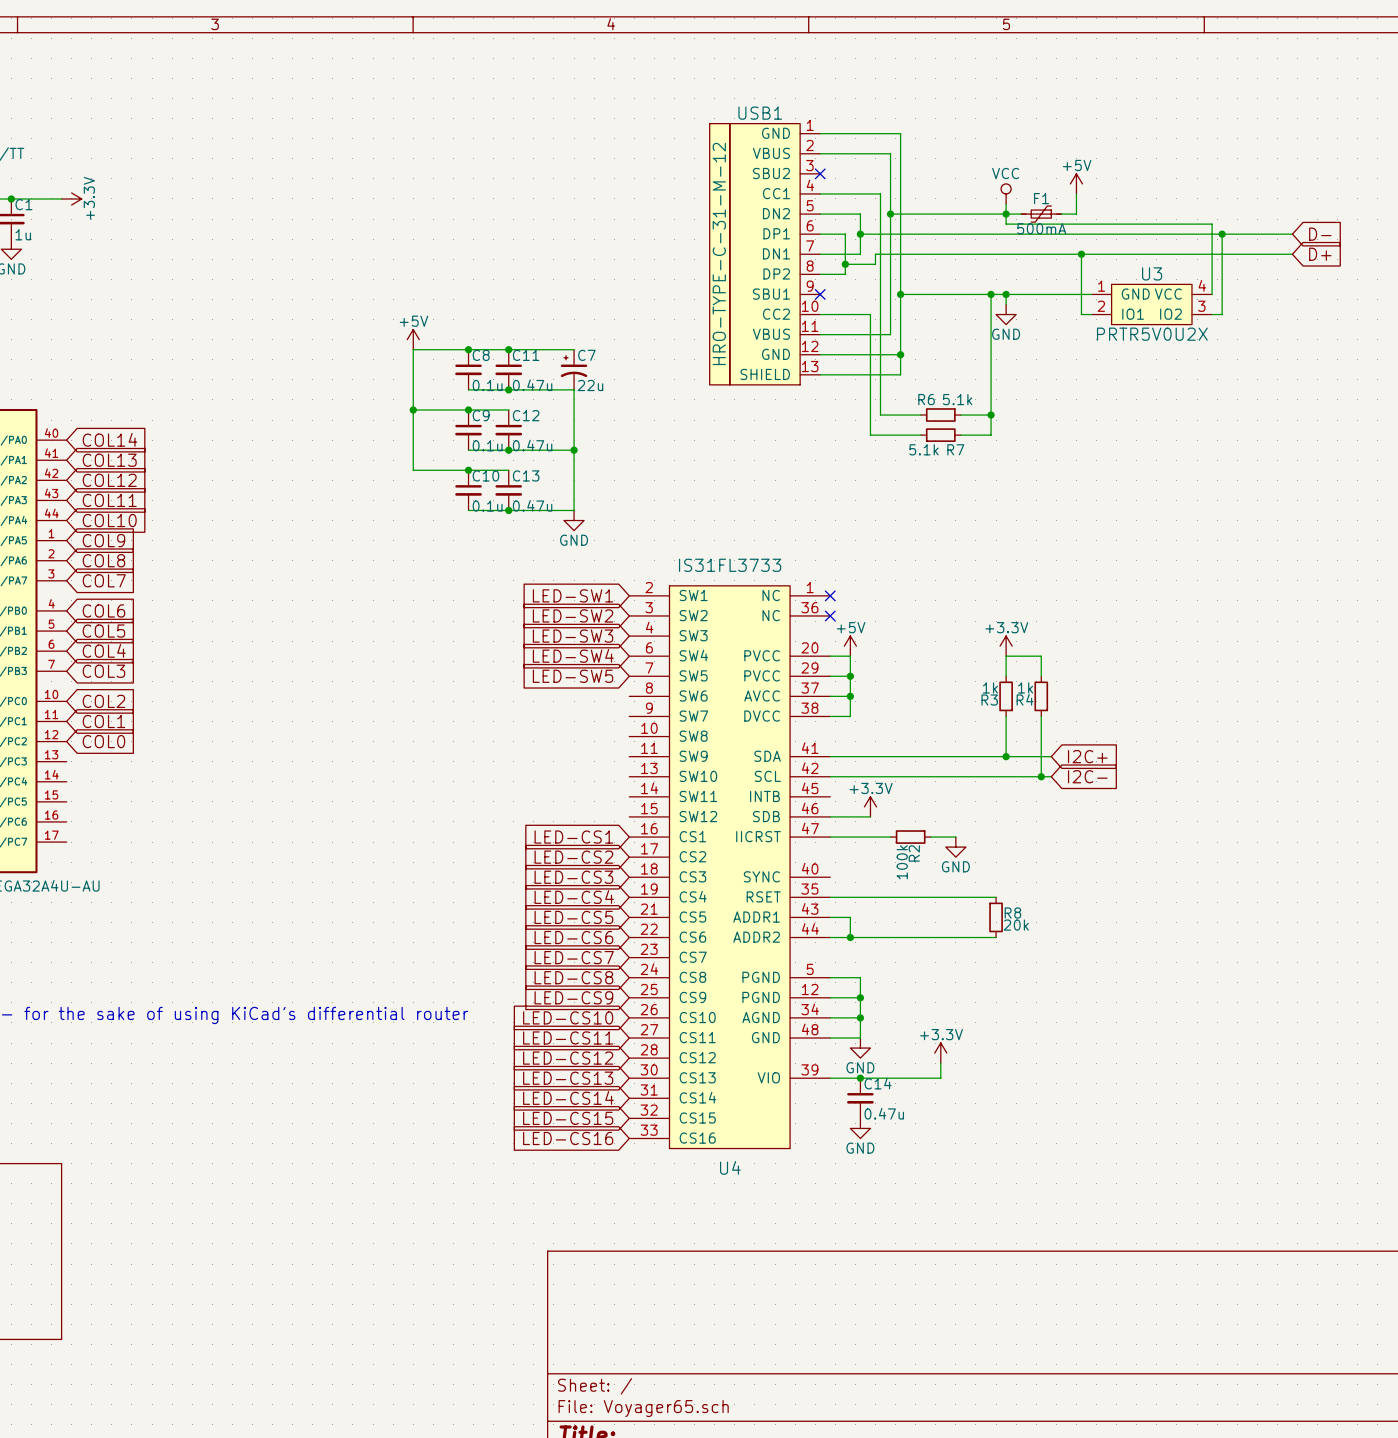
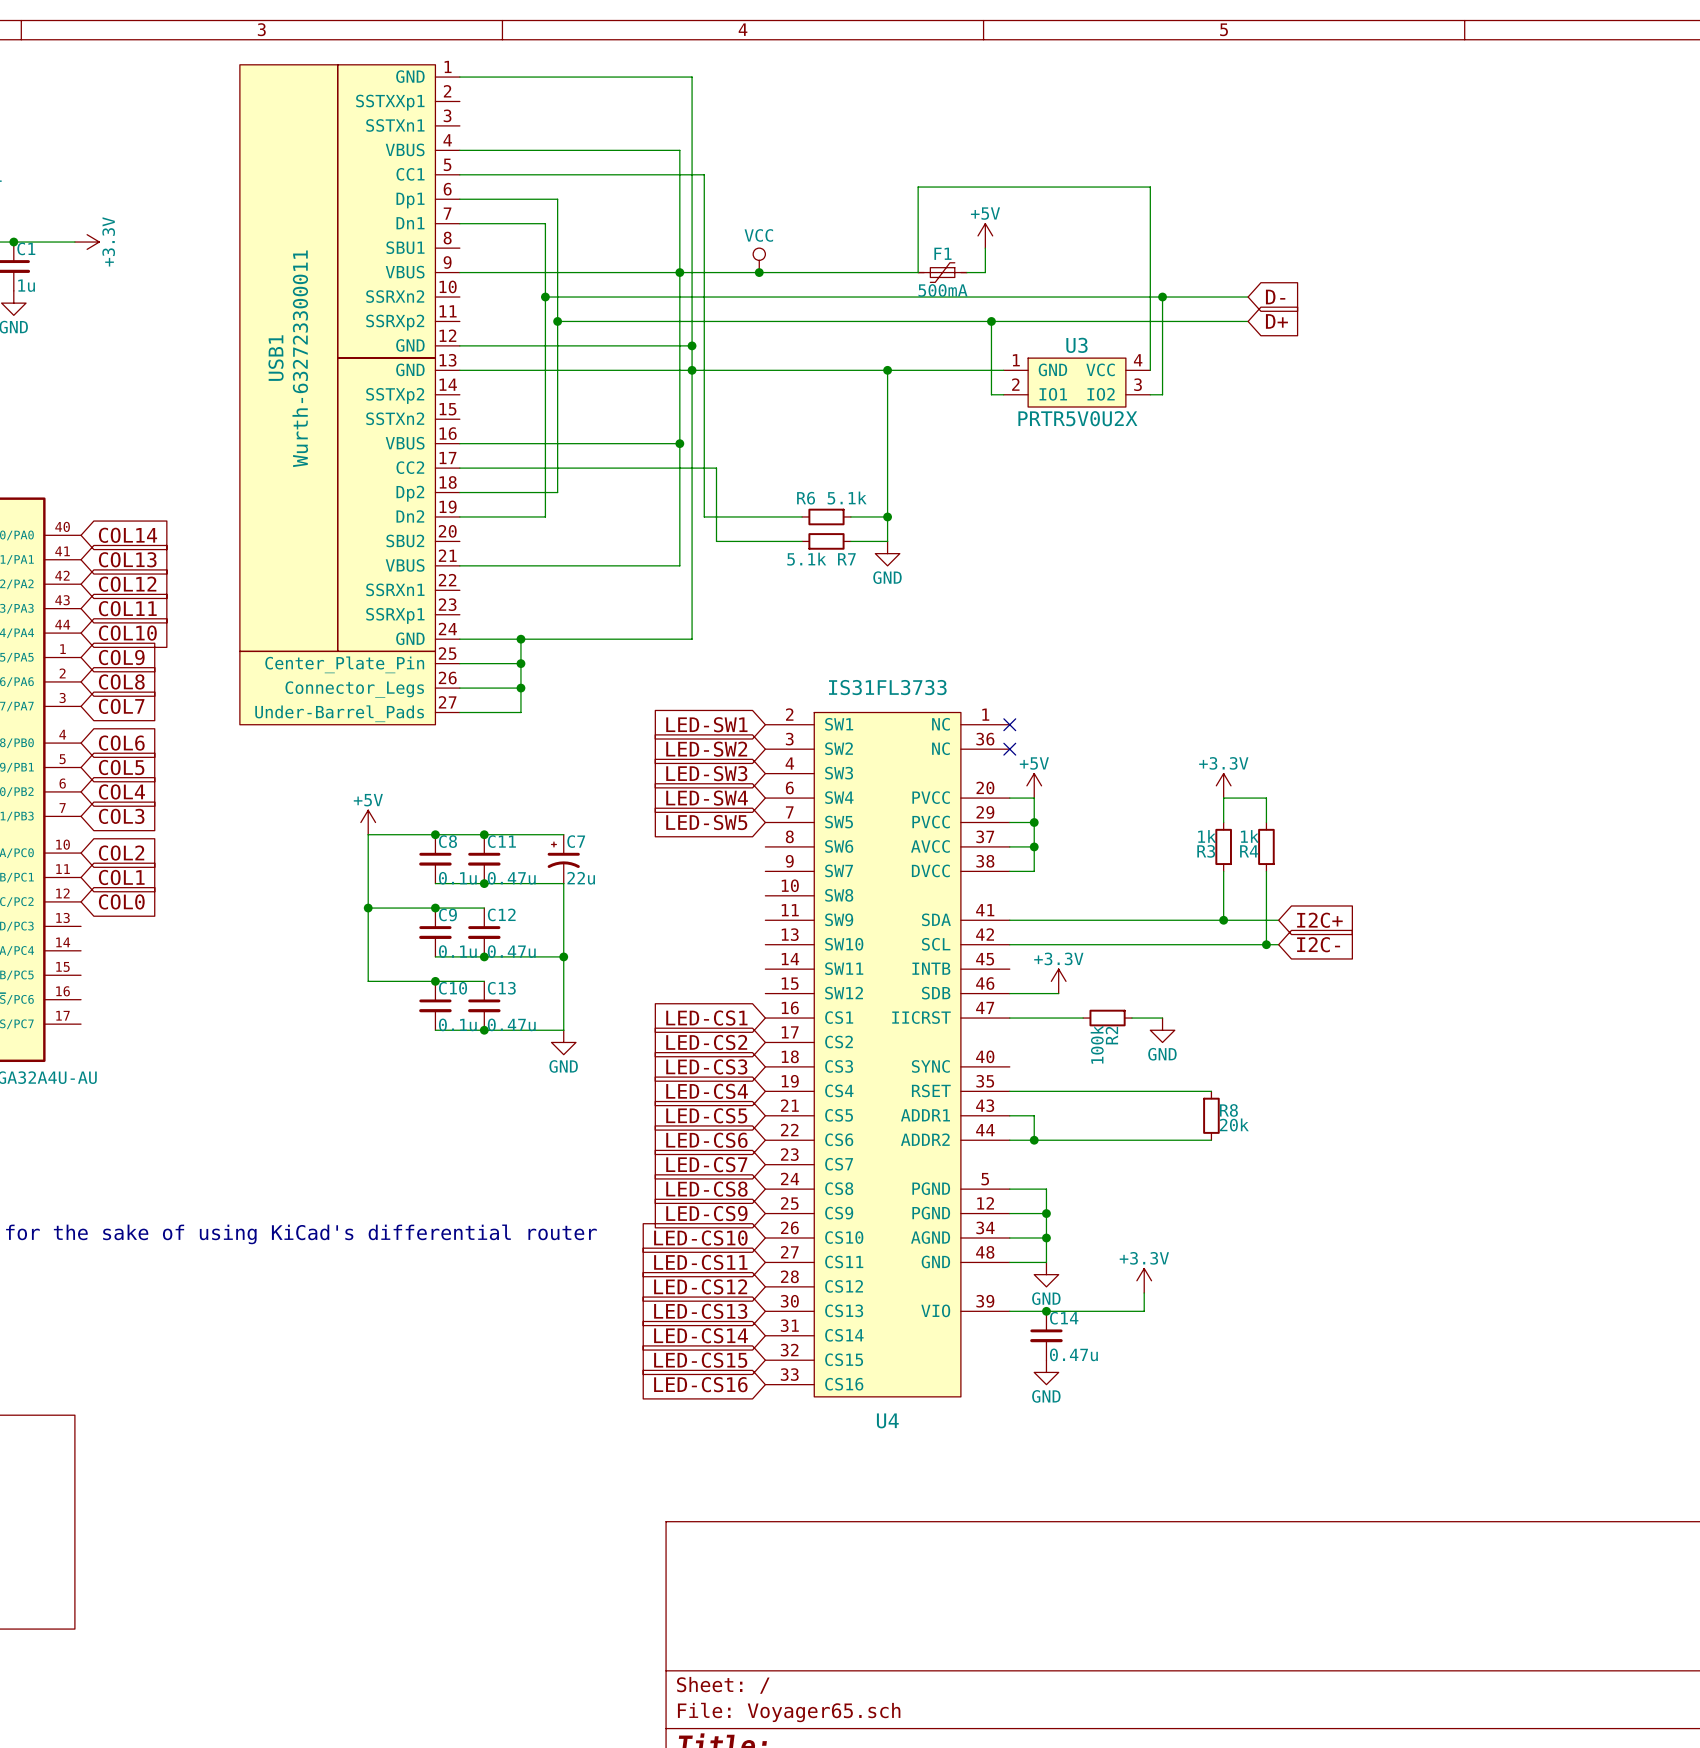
wire: none -> (459, 77) (692, 77) (692, 639) (459, 639)
USB1 name position: USB1 (760, 113) -> USB1 (276, 358)
wire: none -> (459, 150) (679, 150) (679, 565) (459, 565)
USB1 symbol: [709, 123, 821, 385] -> [239, 64, 460, 725]
wire: (820, 133) (900, 133) (900, 374) (820, 374) -> none
wire: none -> (459, 174) (704, 174) (704, 516) (802, 516)
wire: none -> (997, 187) (918, 187) (918, 272) (459, 272)
wire: (890, 153) (890, 334) (820, 334) -> (1083, 187) (1150, 187) (1150, 370)
wire: none -> (459, 199) (557, 199) (557, 492) (459, 492)
no-connect mark: (820, 173) -> none
wire: none -> (459, 223) (545, 223) (545, 516) (459, 516)
power symbol: +5V (1076, 183) -> none
power symbol: none -> +5V (985, 235)
wire: (820, 193) (880, 193) (880, 415) (920, 415) -> none
power symbol: VCC (1006, 193) -> none
wire: (1076, 193) (1076, 214) (1061, 214) -> none
wire: none -> (985, 248) (985, 272) (967, 272)
wire: (1006, 204) (1006, 224) (1212, 224) (1212, 294) -> none
power symbol: none -> VCC (759, 260)
wire: (820, 214) (860, 214) (860, 254) (820, 254) -> none
wire: (890, 214) (1021, 214) -> none
junction: (890, 214) -> none
junction: (1006, 214) -> none
F1 position: (1041, 214) -> (942, 272)
junction: none -> (679, 272)
junction: none -> (759, 272)
wire: (820, 234) (845, 234) (845, 274) (820, 274) -> none
wire: (860, 234) (1292, 234) -> none
junction: (860, 234) -> none
wire: (1222, 234) (1222, 314) (1212, 314) -> none
junction: (1222, 234) -> none
global label: D- (1320, 234) -> none
wire: none -> (545, 297) (1248, 297)
junction: none -> (545, 297)
wire: none -> (1162, 297) (1162, 394) (1150, 394)
junction: none -> (1162, 297)
global label: none -> D- (1275, 297)
USB1 value: HRO-TYPE-C-31-M-12 (719, 253) -> Wurth-632723300011 (300, 358)
wire: (1081, 254) (1081, 314) (1091, 314) -> none
junction: (1081, 254) -> none
wire: (1292, 254) (875, 254) (875, 264) -> (1248, 321) (1064, 321)
global label: D+ (1320, 254) -> none
wire: none -> (557, 321) (1028, 321)
junction: none -> (557, 321)
wire: none -> (991, 321) (991, 394) (1003, 394)
junction: none -> (991, 321)
junction: (845, 264) -> none
global label: none -> D+ (1276, 321)
wire: none -> (459, 345) (692, 345)
junction: none -> (692, 345)
no-connect mark: (820, 294) -> none
wire: (900, 294) (1091, 294) -> none
junction: (900, 294) -> none
wire: (991, 294) (991, 435) (960, 435) -> none
junction: (991, 294) -> none
wire: (1006, 294) (1006, 304) -> none
junction: (1006, 294) -> none
wire: none -> (459, 370) (1003, 370)
junction: none -> (692, 370)
wire: none -> (887, 370) (887, 541) (850, 541)
junction: none -> (887, 370)
U3 position: (1151, 304) -> (1077, 382)
wire: (820, 314) (870, 314) (870, 435) (920, 435) -> none
power symbol: GND (1006, 314) -> none
power symbol: +5V (413, 339) -> none
junction: (468, 349) -> none
junction: (508, 349) -> none
wire: (574, 349) (413, 349) (413, 470) (508, 470) -> none
wire: (820, 354) (900, 354) -> none
junction: (900, 354) -> none
wire: none -> (459, 443) (679, 443)
junction: none -> (679, 443)
C8 position: (468, 369) -> (435, 859)
C11 position: (508, 369) -> (484, 859)
C7 position: (574, 369) -> (563, 859)
wire: none -> (459, 468) (716, 468) (716, 541) (802, 541)
wire: (468, 389) (574, 389) (574, 510) (468, 510) -> none
junction: (508, 389) -> none
wire: (413, 410) (508, 410) -> none
junction: (413, 410) -> none
junction: (468, 410) -> none
R6 position: (940, 415) -> (826, 516)
wire: (960, 415) (991, 415) -> none
junction: (991, 415) -> none
wire: none -> (850, 516) (887, 516)
junction: none -> (887, 516)
C9 position: (468, 430) -> (435, 932)
C12 position: (508, 430) -> (484, 932)
R7 position: (940, 435) -> (826, 541)
wire: (468, 450) (574, 450) -> none
junction: (508, 450) -> none
junction: (574, 450) -> none
power symbol: none -> GND (887, 553)
junction: (468, 470) -> none
C10 position: (468, 490) -> (435, 1005)
C13 position: (508, 490) -> (484, 1005)
junction: (508, 510) -> none
power symbol: GND (574, 520) -> none
wire: none -> (520, 639) (520, 712) (459, 712)
junction: none -> (520, 639)
wire: none -> (459, 663) (520, 663)
junction: none -> (520, 663)
wire: none -> (459, 688) (520, 688)
junction: none -> (520, 688)
power symbol: none -> +5V (368, 822)
junction: none -> (435, 834)
junction: none -> (484, 834)
wire: none -> (563, 834) (368, 834) (368, 981) (484, 981)
wire: none -> (435, 883) (563, 883) (563, 1030) (435, 1030)
junction: none -> (484, 883)
wire: none -> (368, 908) (484, 908)
junction: none -> (368, 908)
junction: none -> (435, 908)
wire: none -> (435, 956) (563, 956)
junction: none -> (484, 956)
junction: none -> (563, 956)
junction: none -> (435, 981)
junction: none -> (484, 1030)
power symbol: none -> GND (563, 1042)

